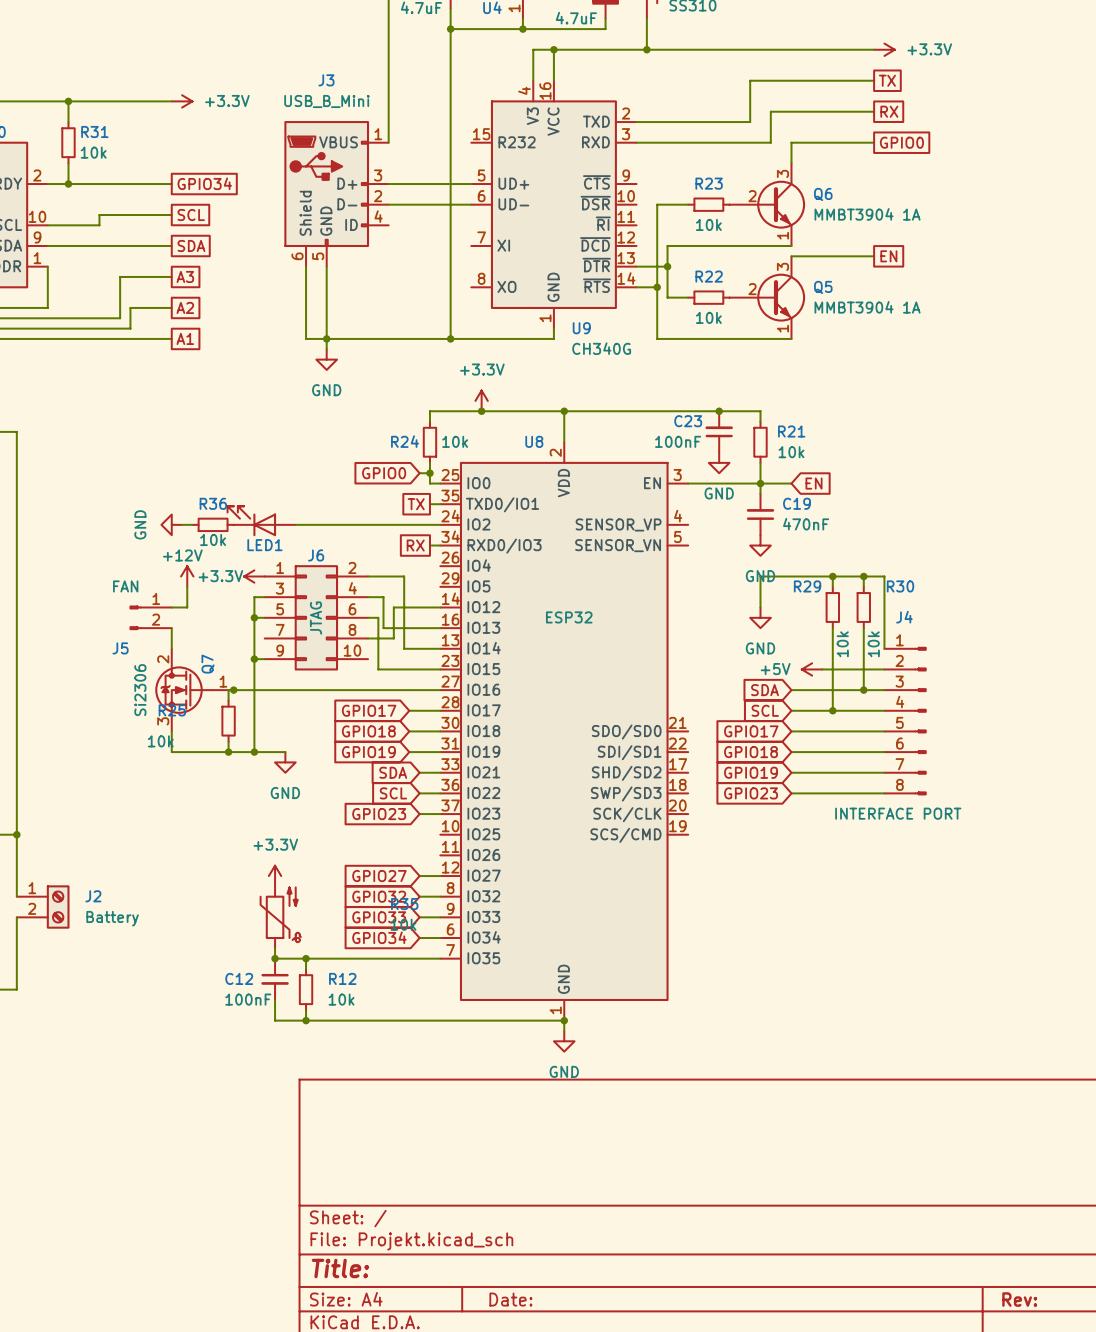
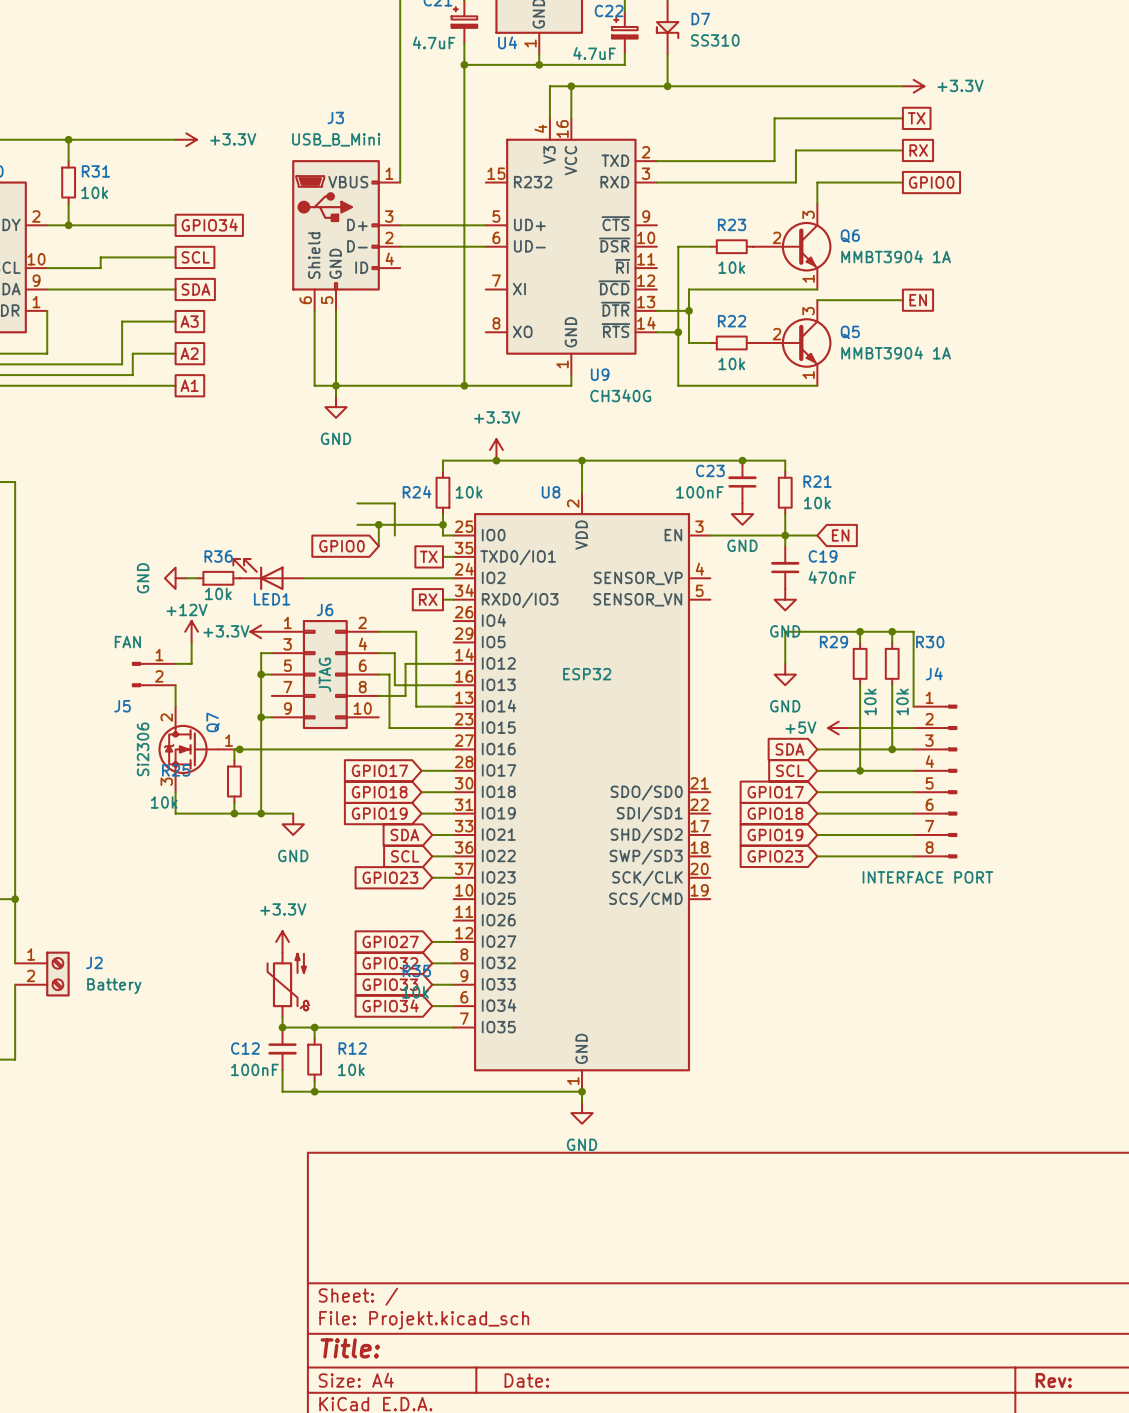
wire: none -> (357, 503) (394, 503) (394, 535)
wire: none -> (357, 524) (432, 524)
wire: none -> (378, 524) (378, 546)
junction: none -> (378, 524)
global label position: GPIO0 (384, 473) -> GPIO0 (341, 546)

